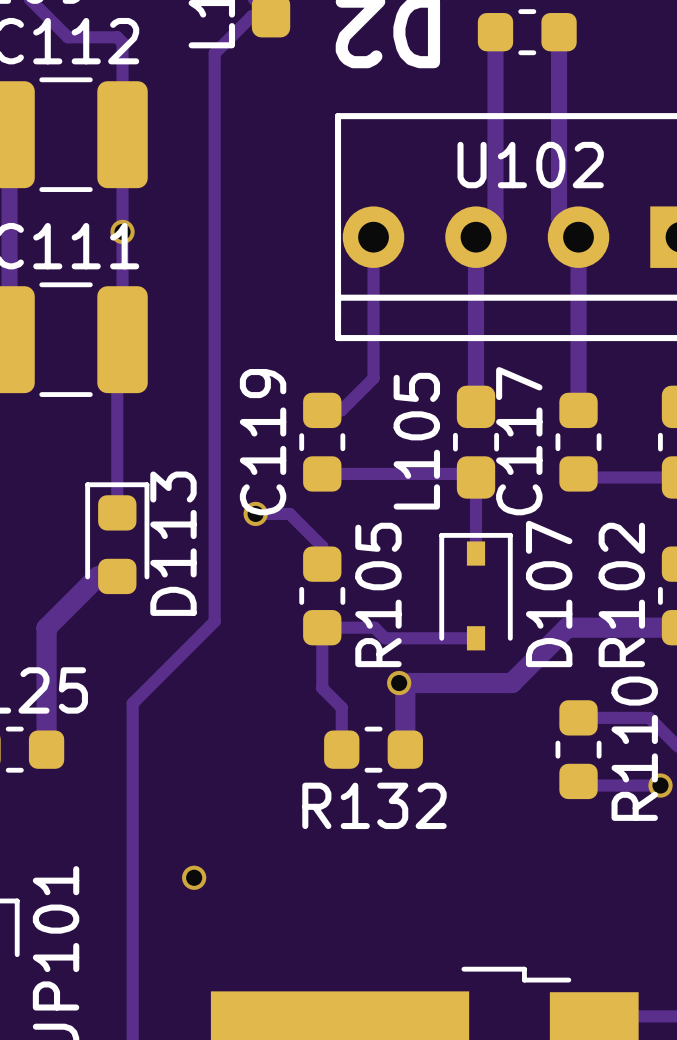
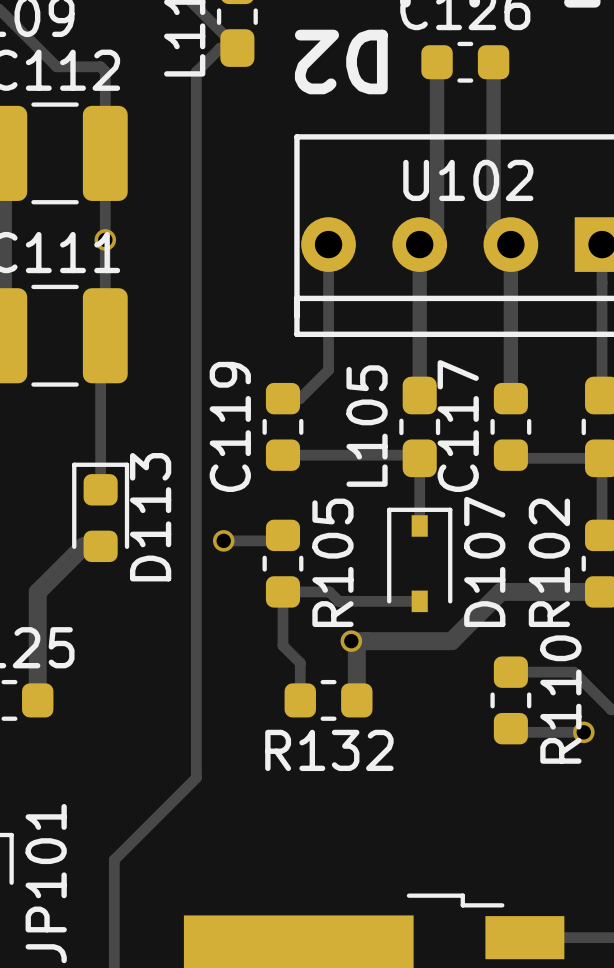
track: (224, 43) (214, 53) (214, 621) (132, 703) (132, 929) -> (196, 72) (196, 777) (114, 859)
track: (255, 513) (289, 513) (322, 546) (322, 564) -> (223, 540) (277, 540) (282, 535)
via position: (255, 513) -> (223, 540)
via: (194, 877) -> none

